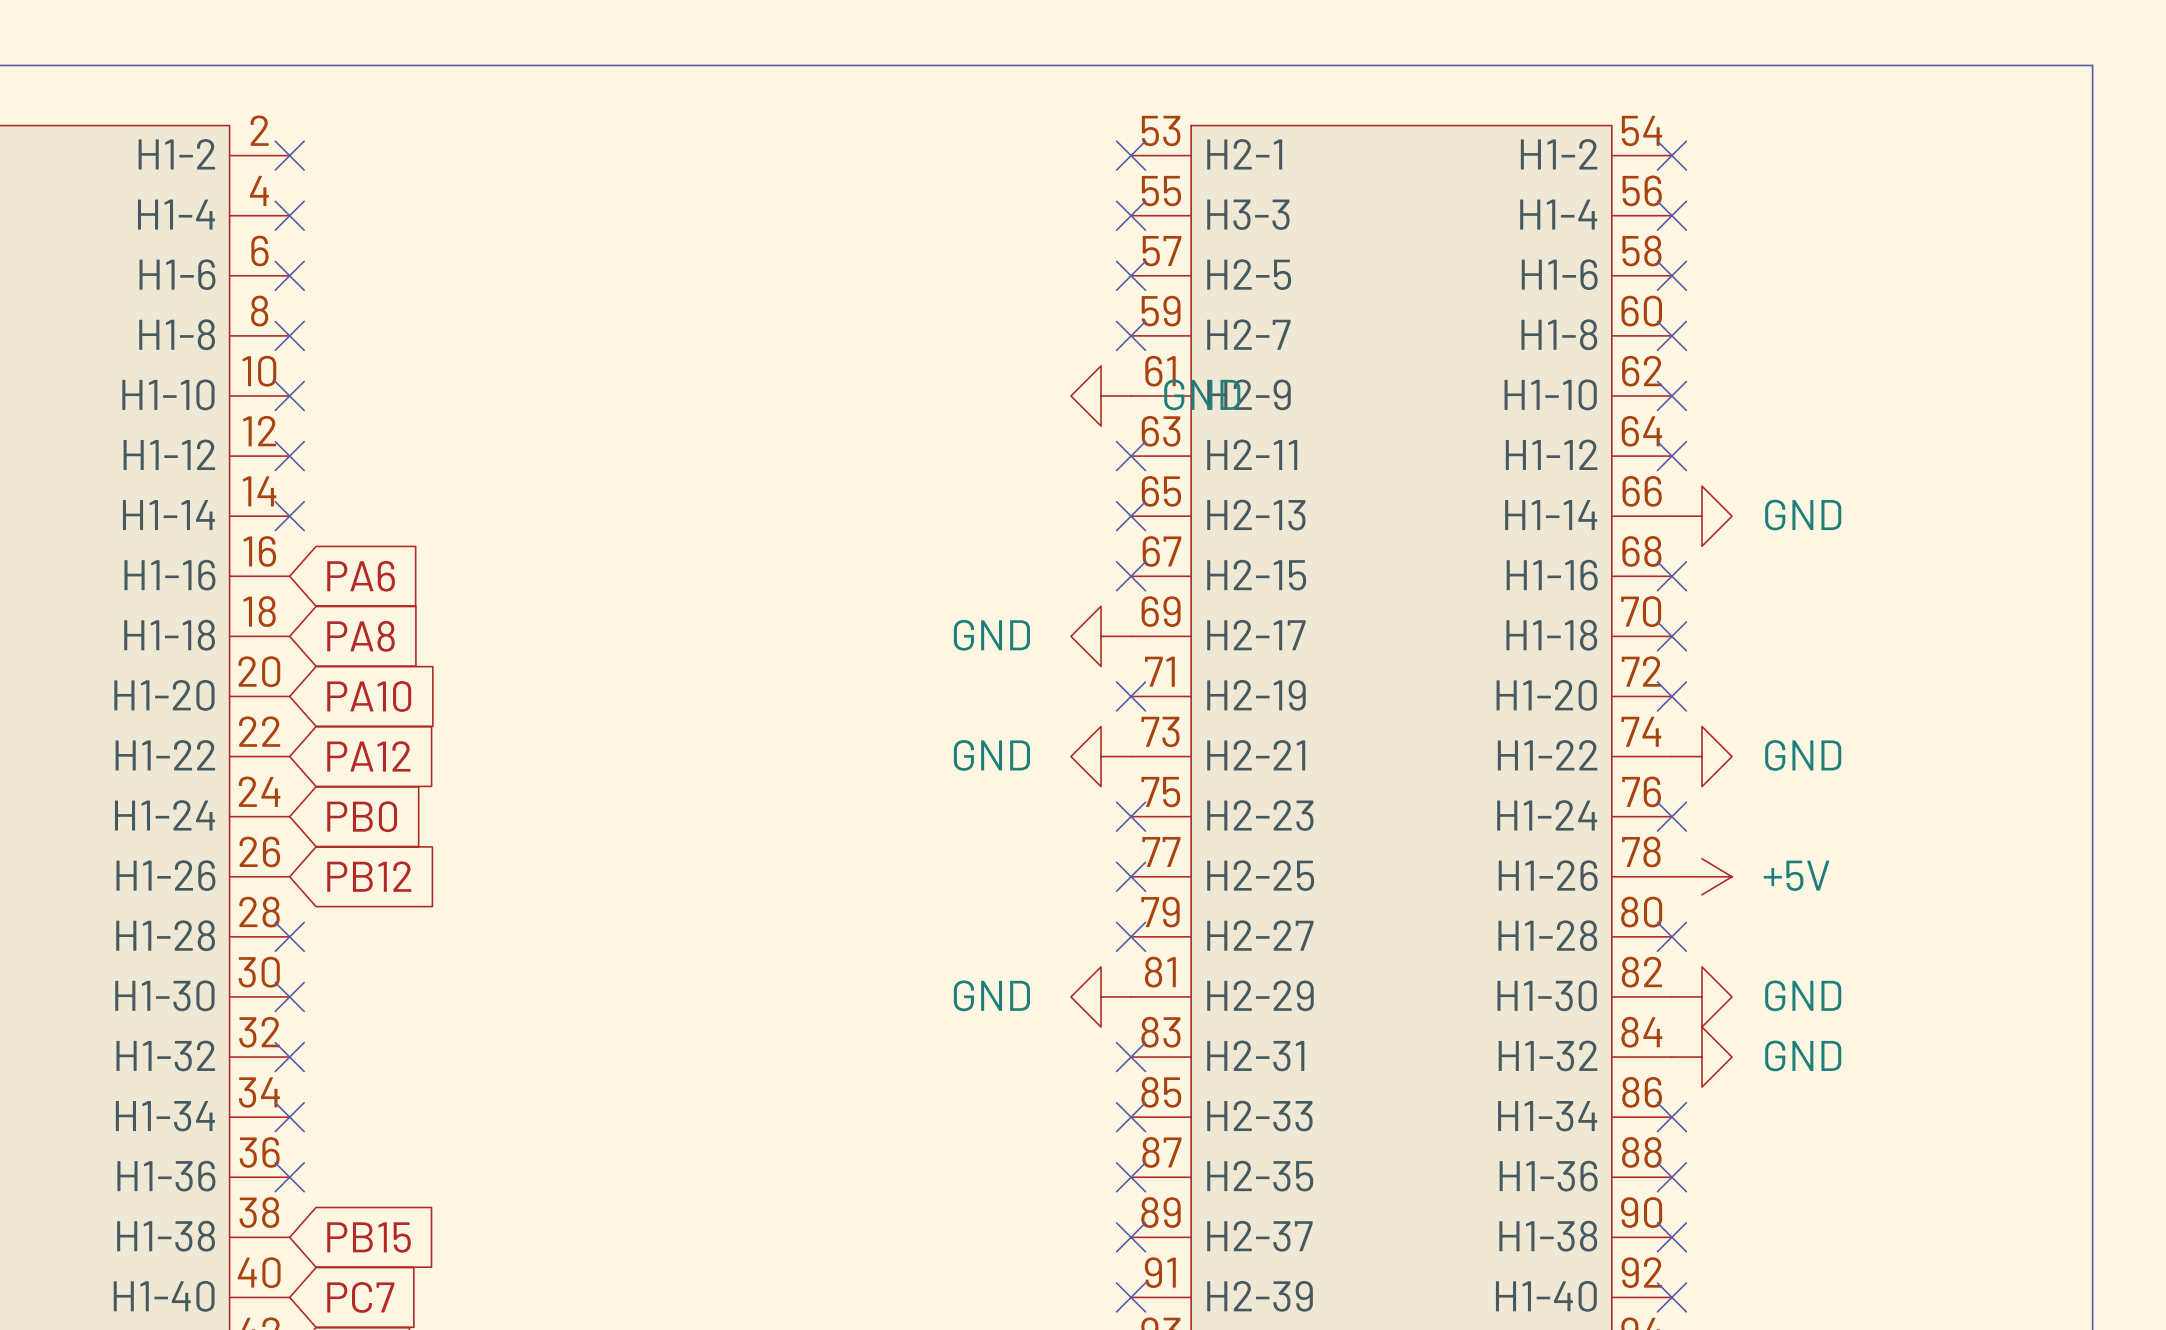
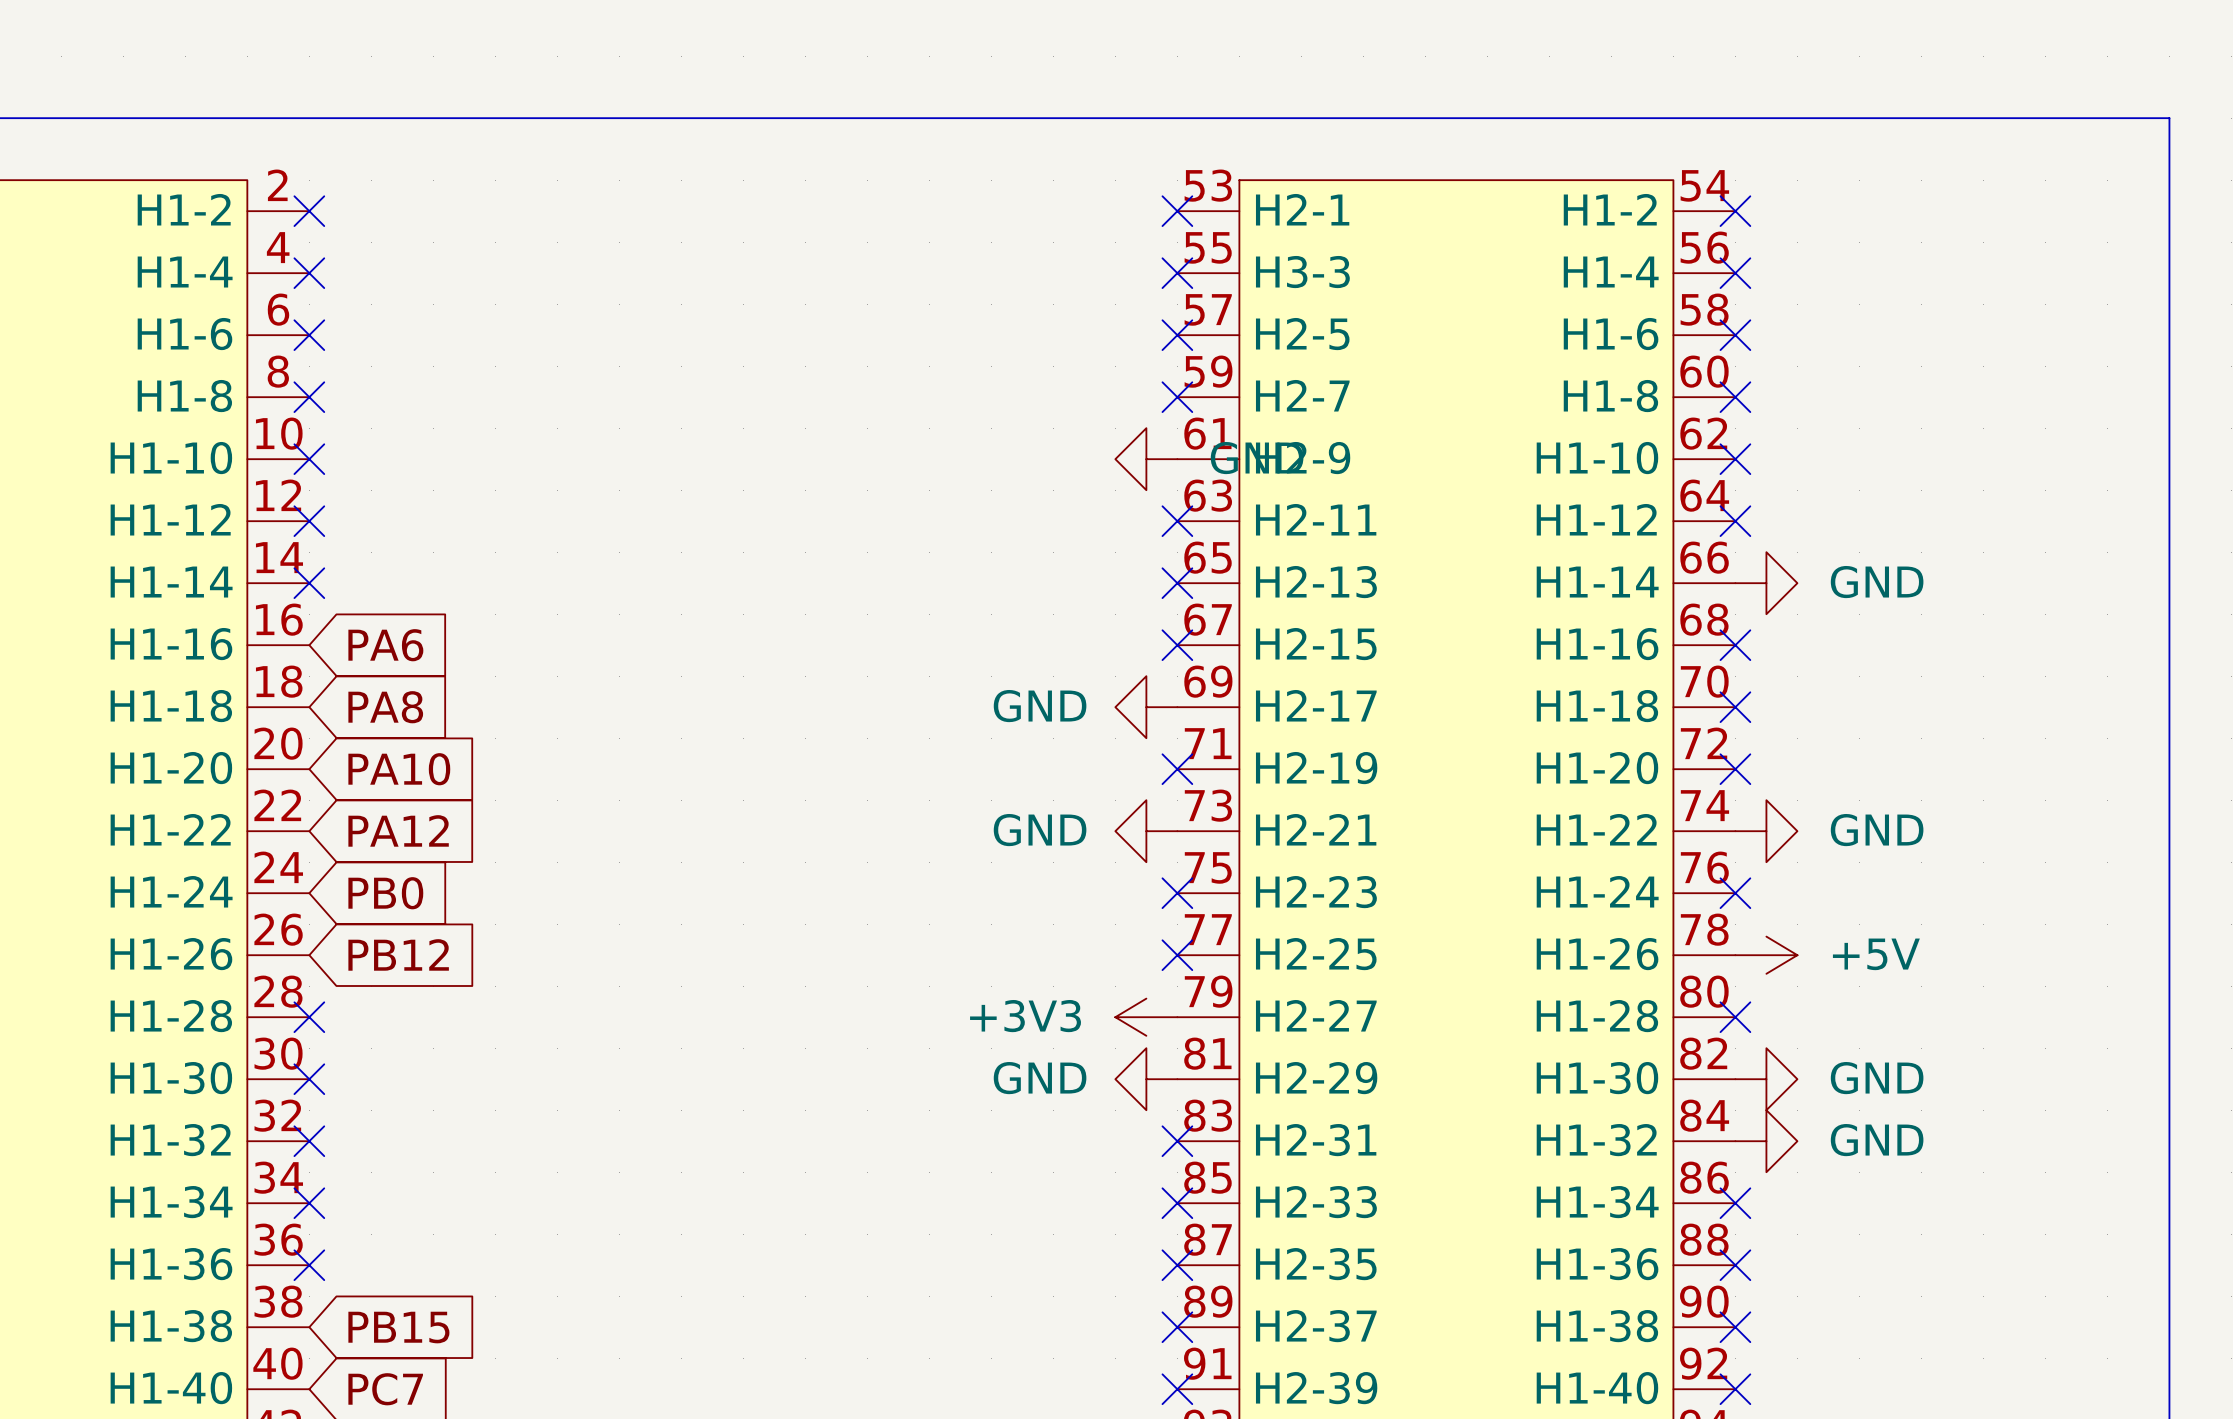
power symbol: none -> +3V3 (1146, 1017)
no-connect mark: (1131, 936) -> none

